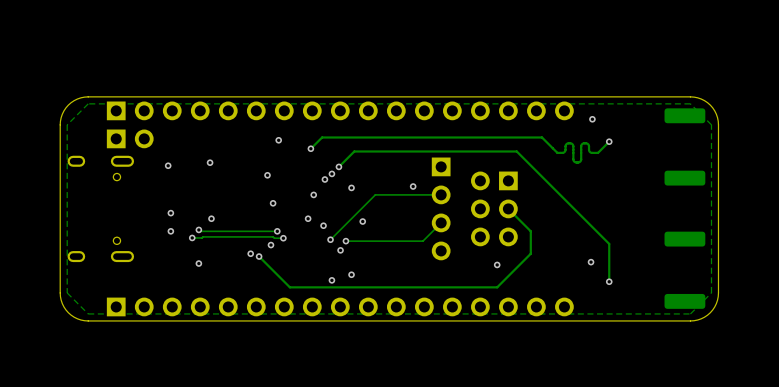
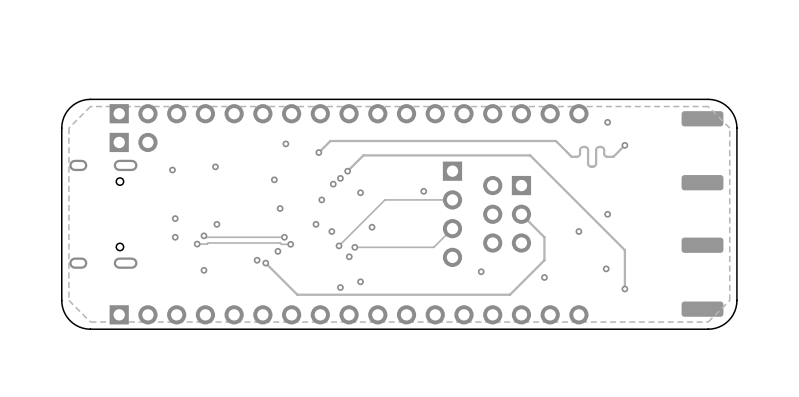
via: none -> (607, 214)
via: none -> (578, 231)
via: none -> (481, 271)
via: (497, 264) -> none
via: none -> (544, 277)

